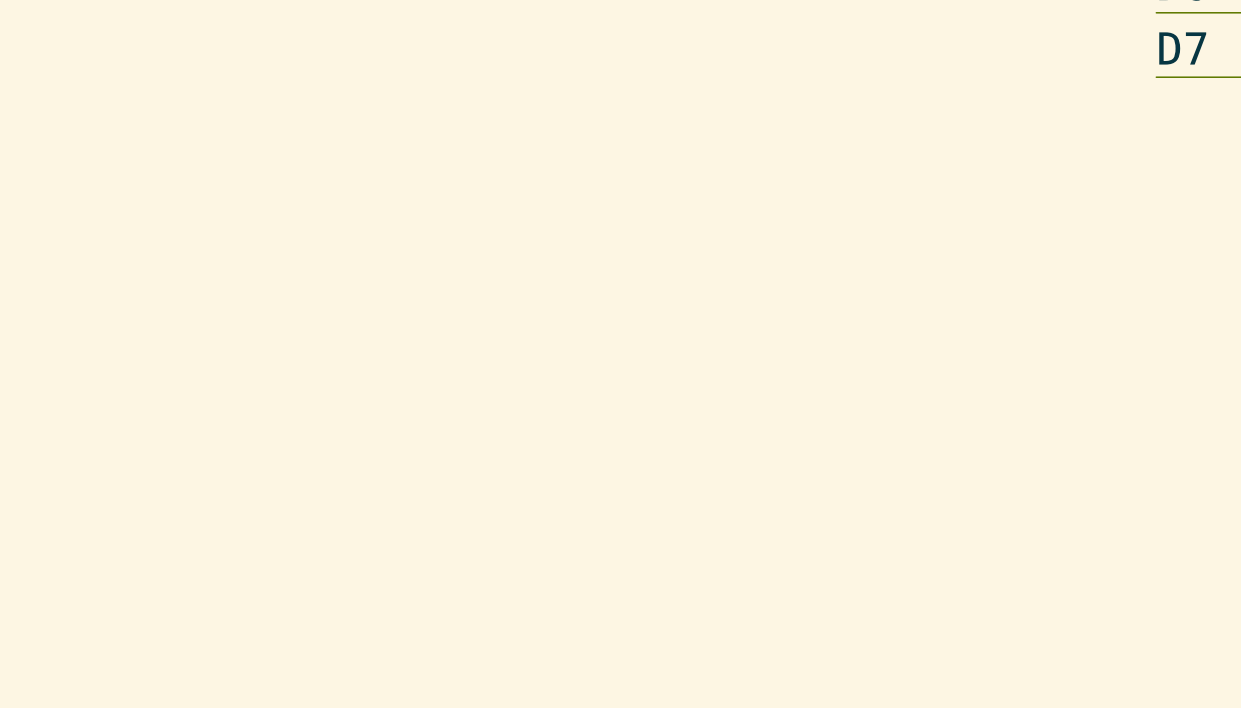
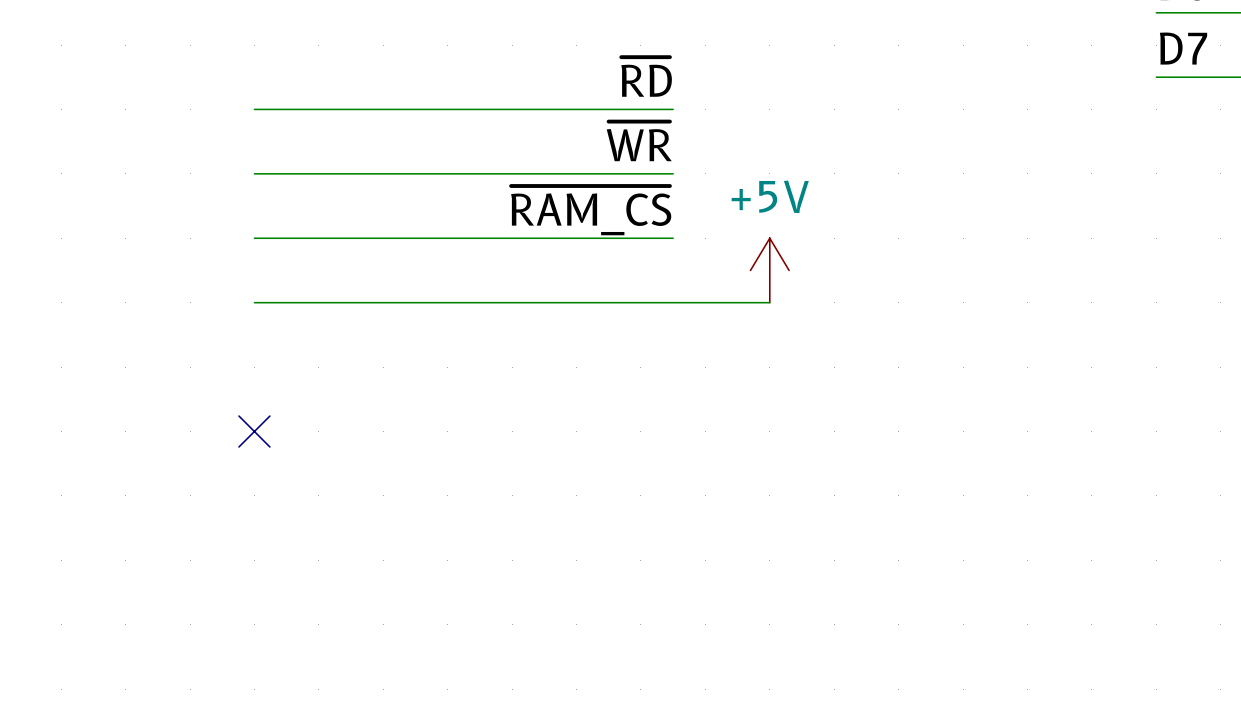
label: none -> ~{RD} (646, 76)
wire: none -> (254, 109) (673, 109)
label: none -> ~{WR} (639, 141)
wire: none -> (254, 173) (673, 173)
label: none -> ~{RAM_CS} (591, 210)
wire: none -> (254, 238) (673, 238)
power symbol: none -> +5V (769, 270)
wire: none -> (254, 302) (769, 302)
no-connect mark: none -> (254, 431)

